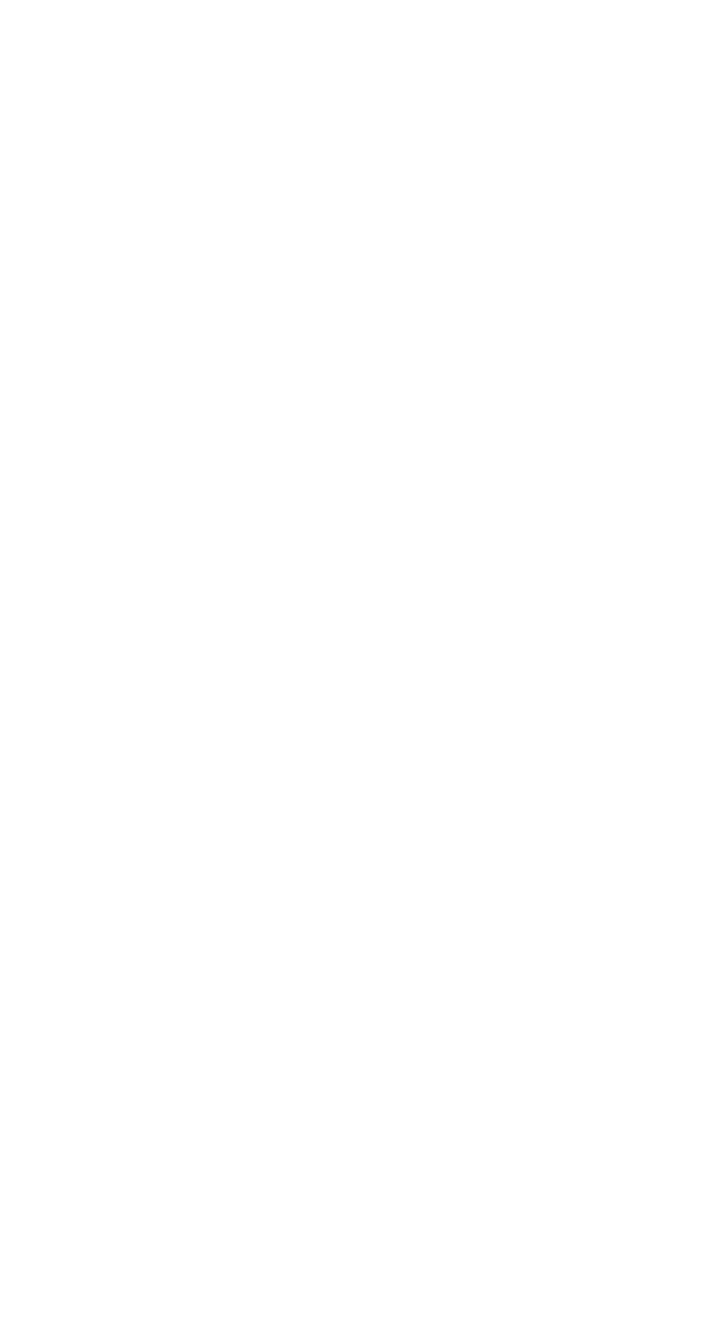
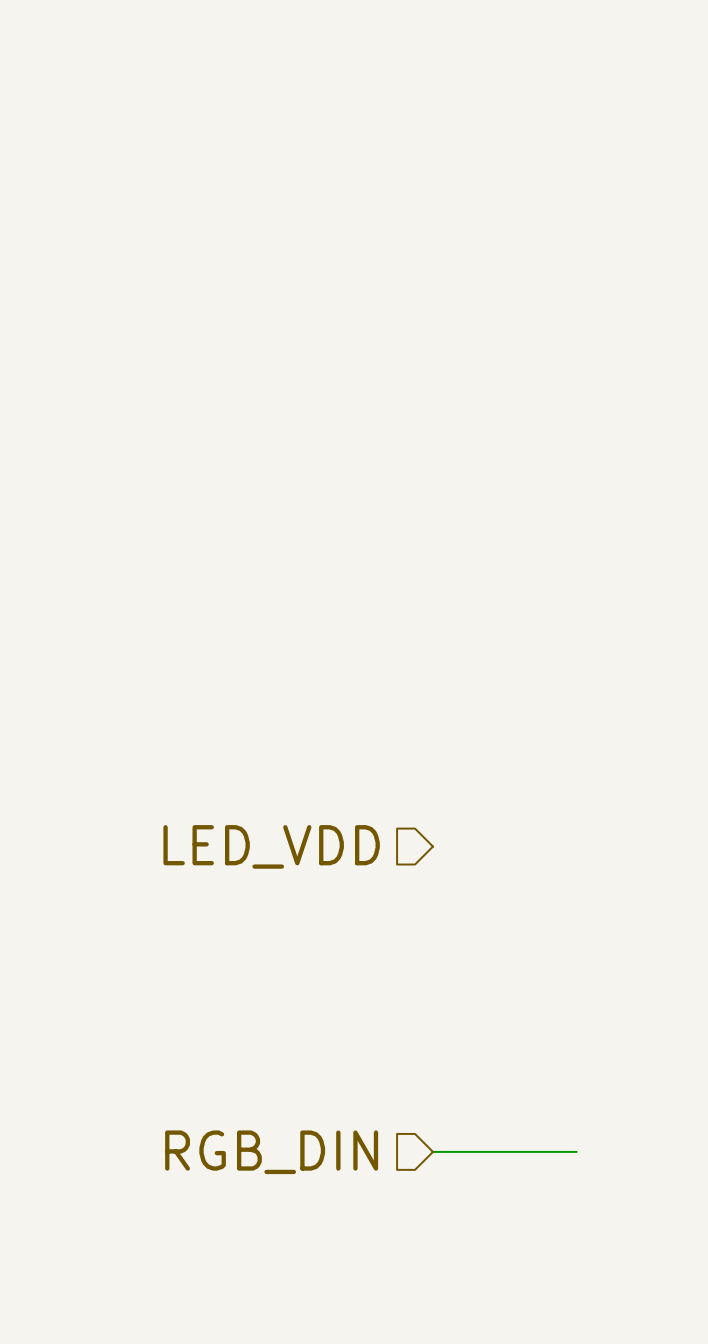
hierarchical label: none -> LED_VDD (271, 846)
wire: none -> (432, 1151) (576, 1151)
hierarchical label: none -> RGB_DIN (271, 1152)

